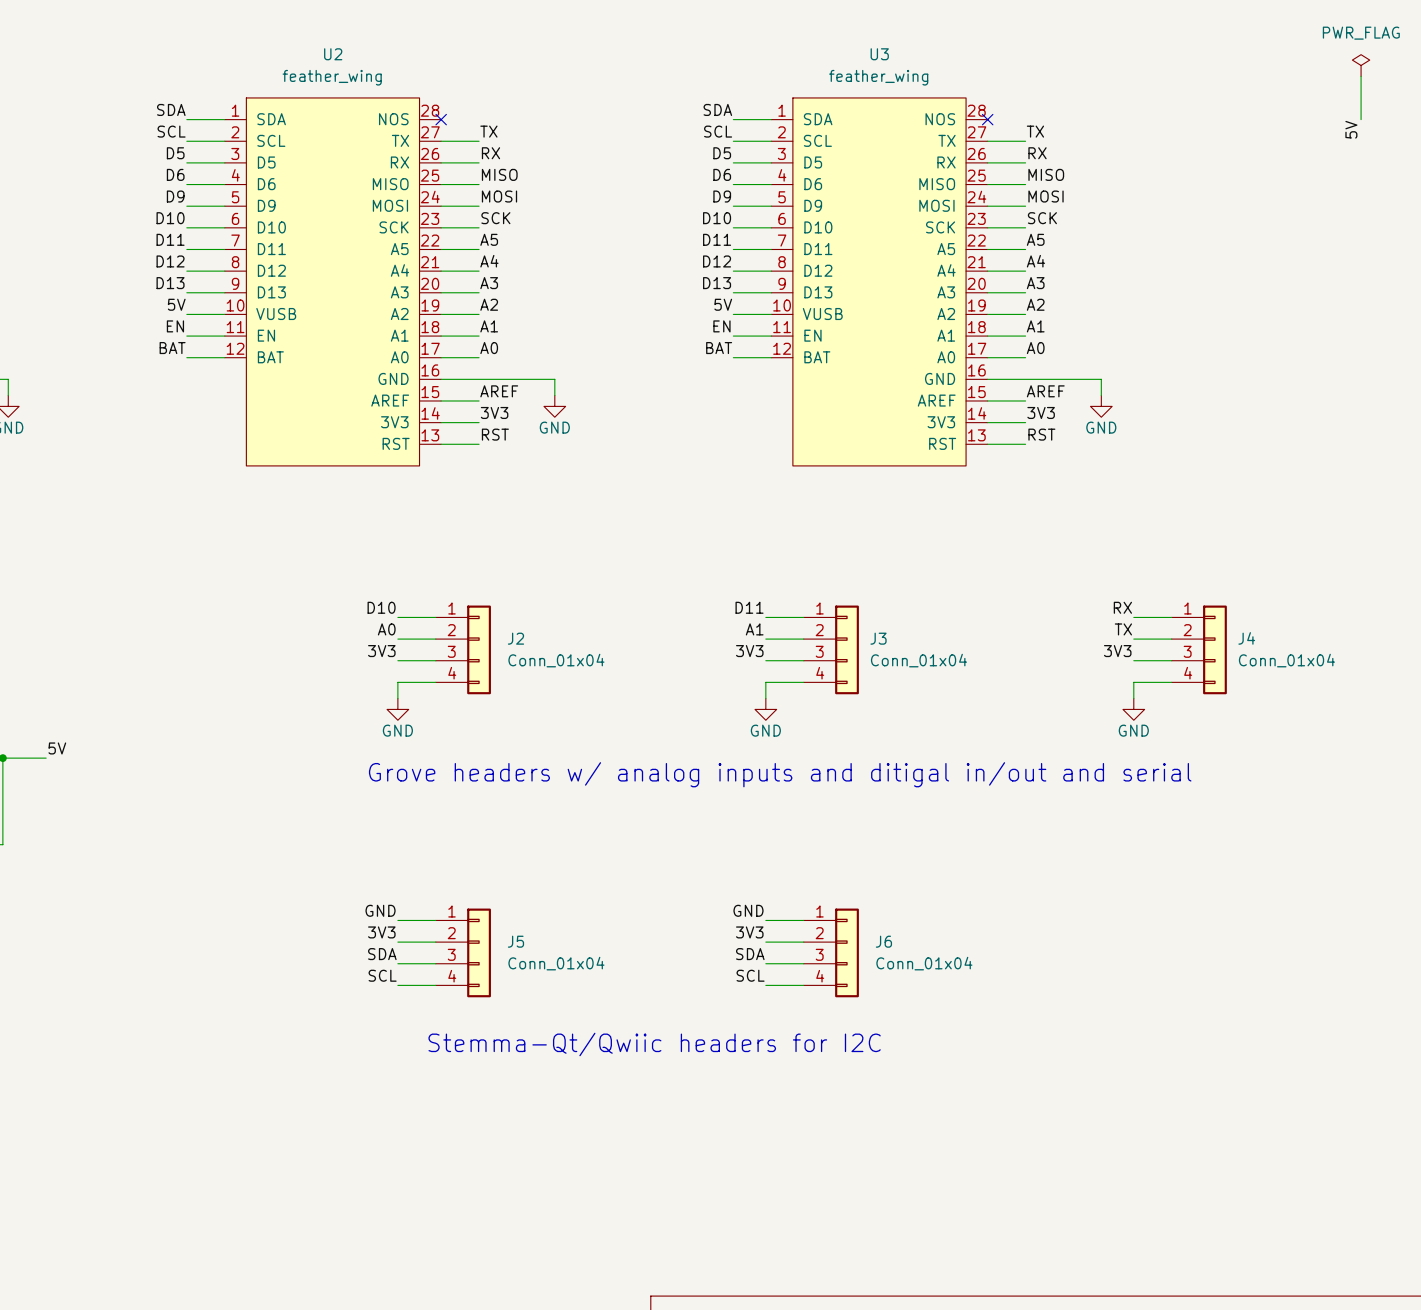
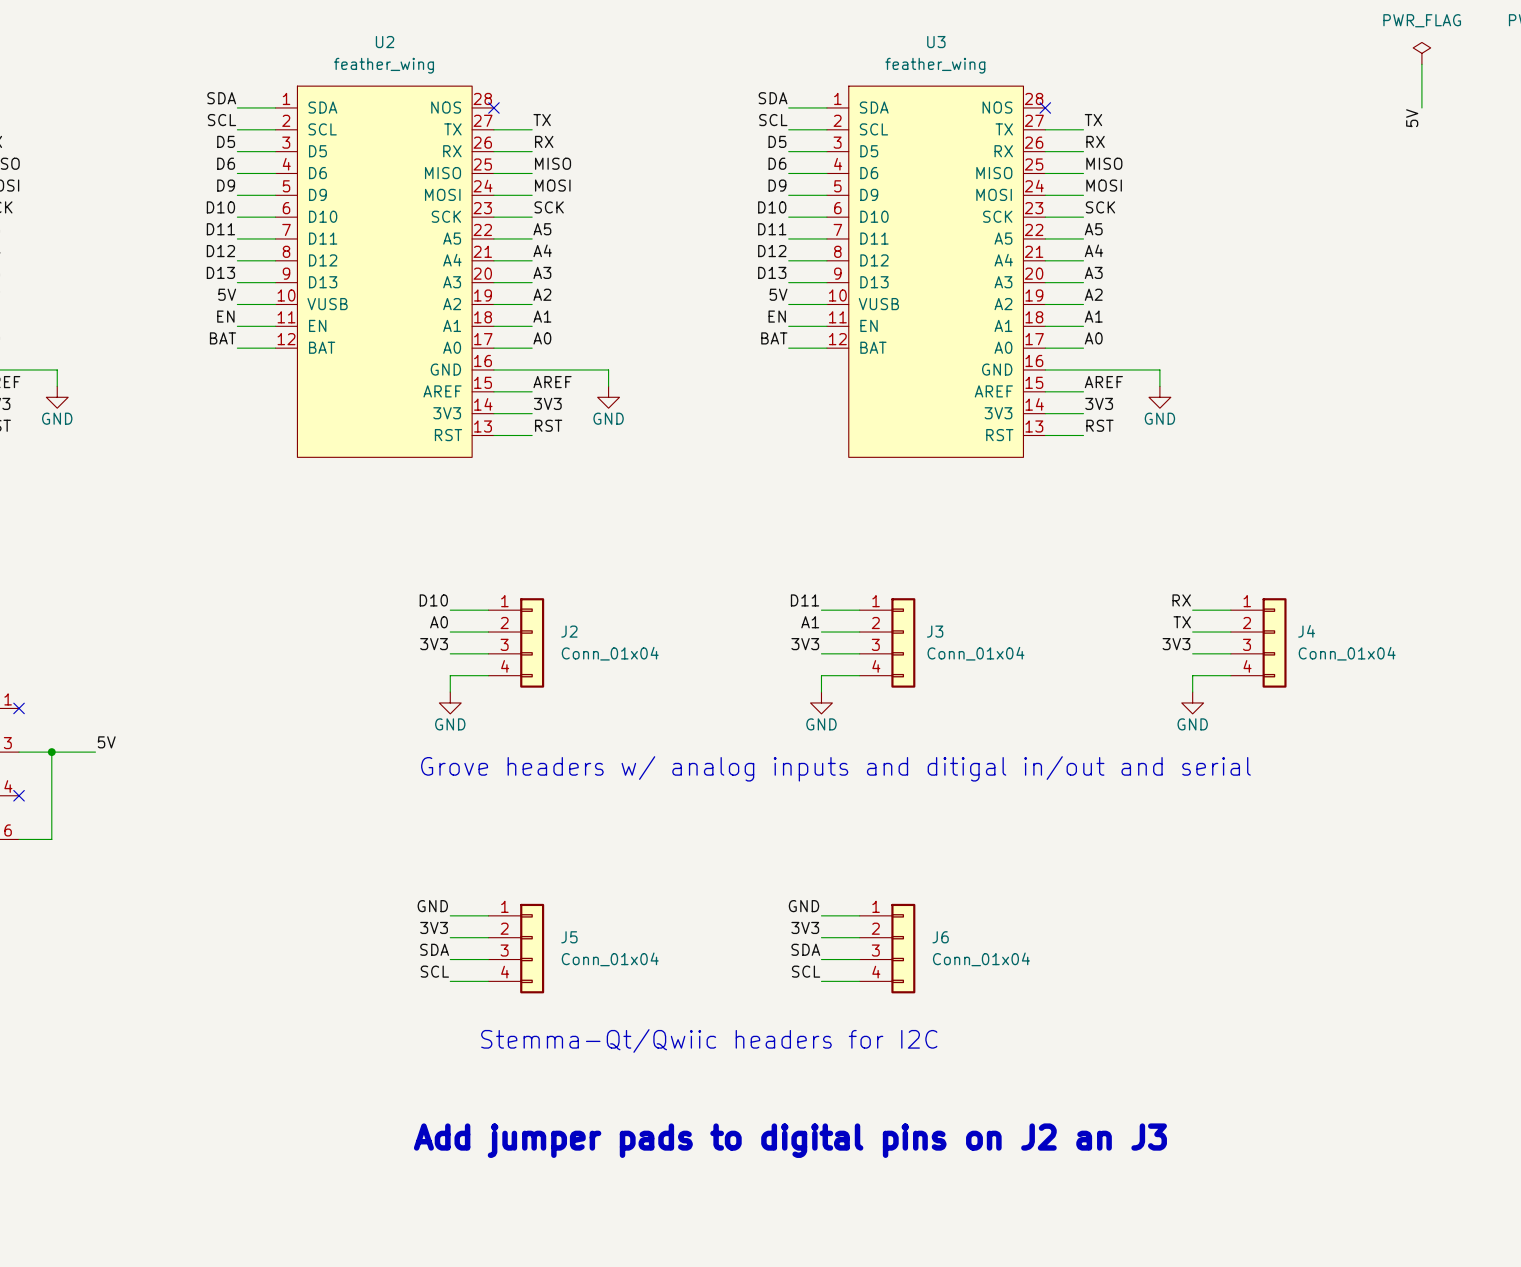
text: none -> Add jumper pads to digital pins on J2 an J3 (790, 1140)

